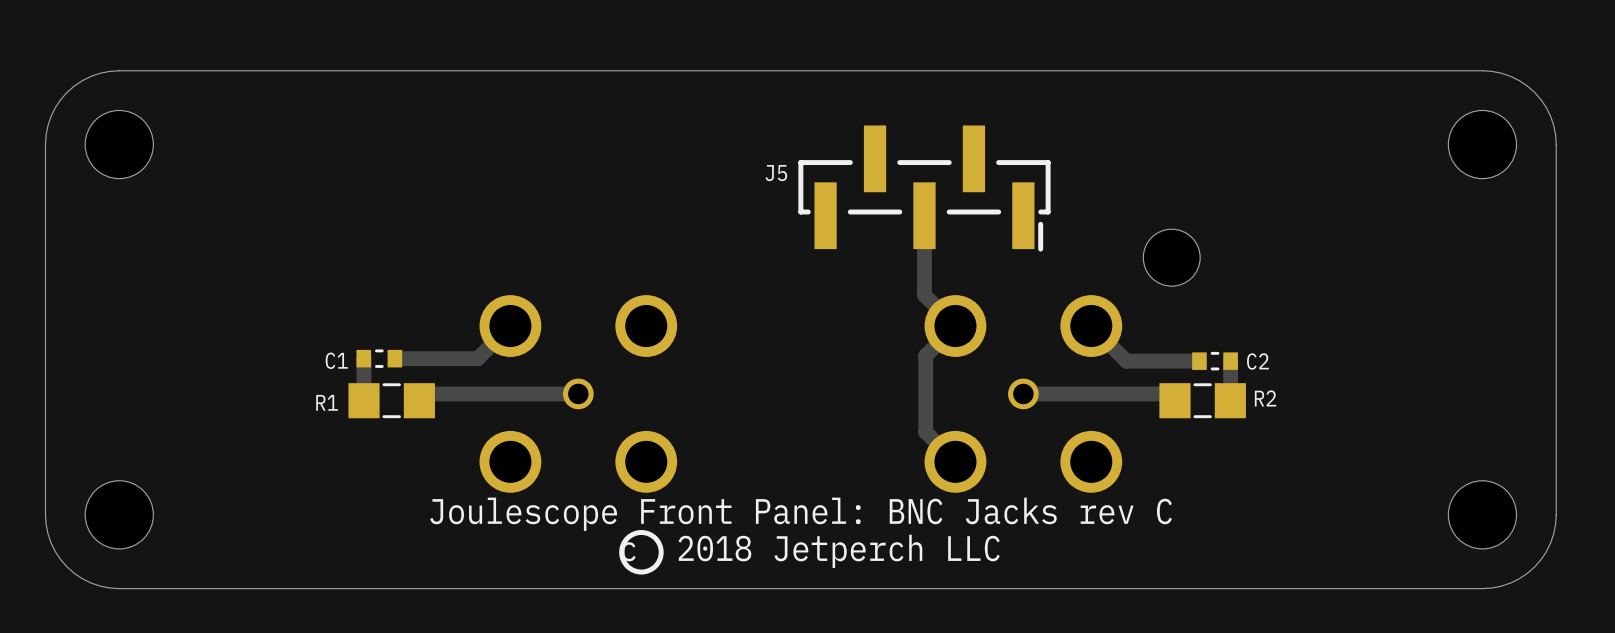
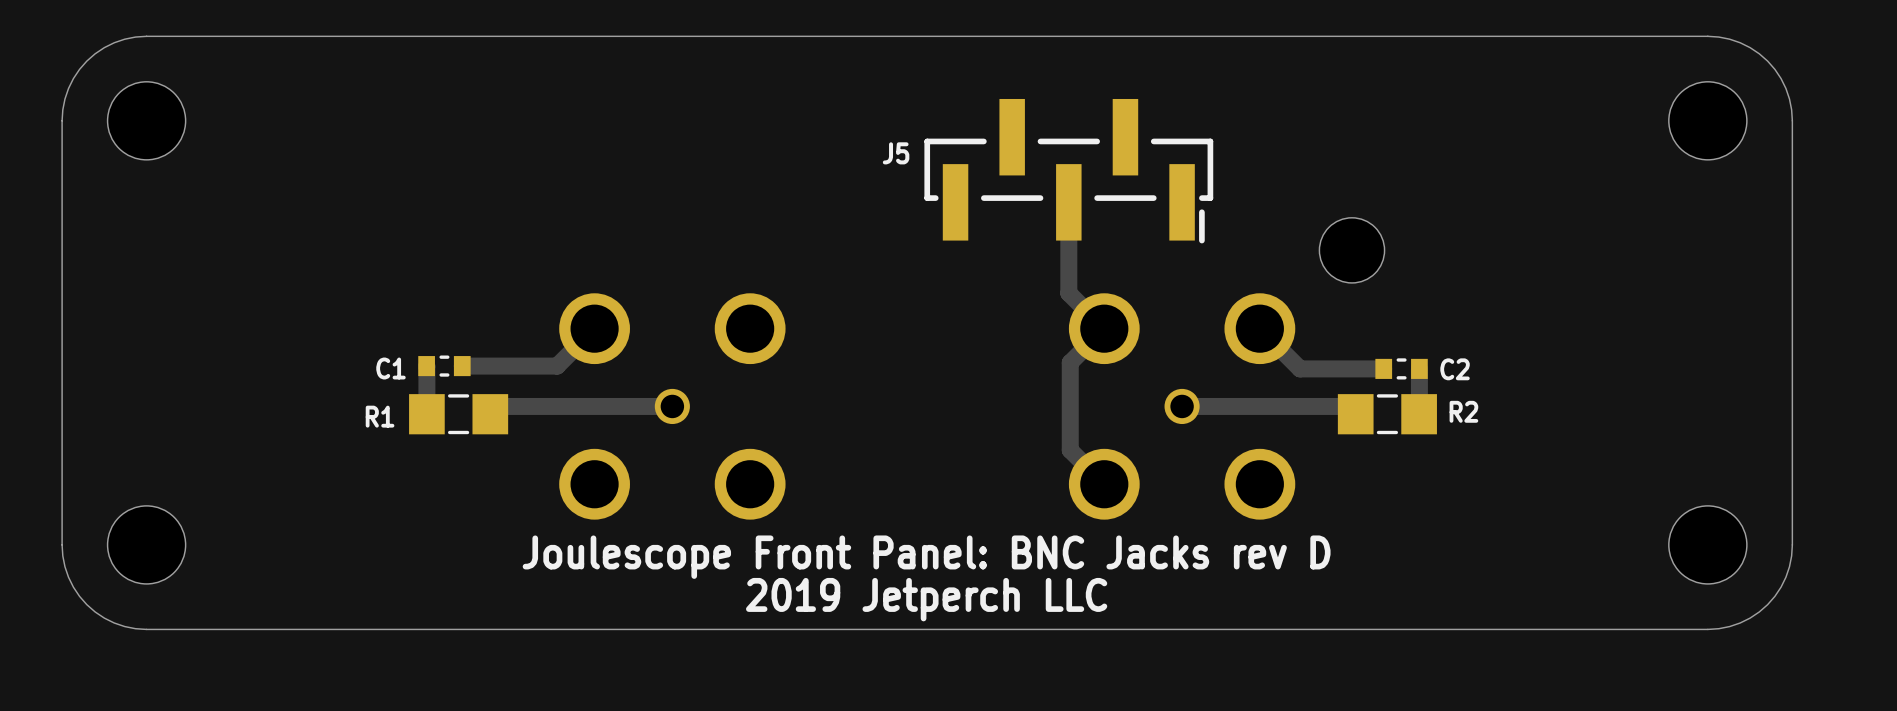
text: Joulescope Front Panel: BNC Jacks rev C (801, 514) -> Joulescope Front Panel: BNC Jacks rev D (926, 557)
drawing: [619, 530, 664, 575] -> none
text: c 2018 Jetperch LLC (810, 551) -> 2019 Jetperch LLC (926, 599)

